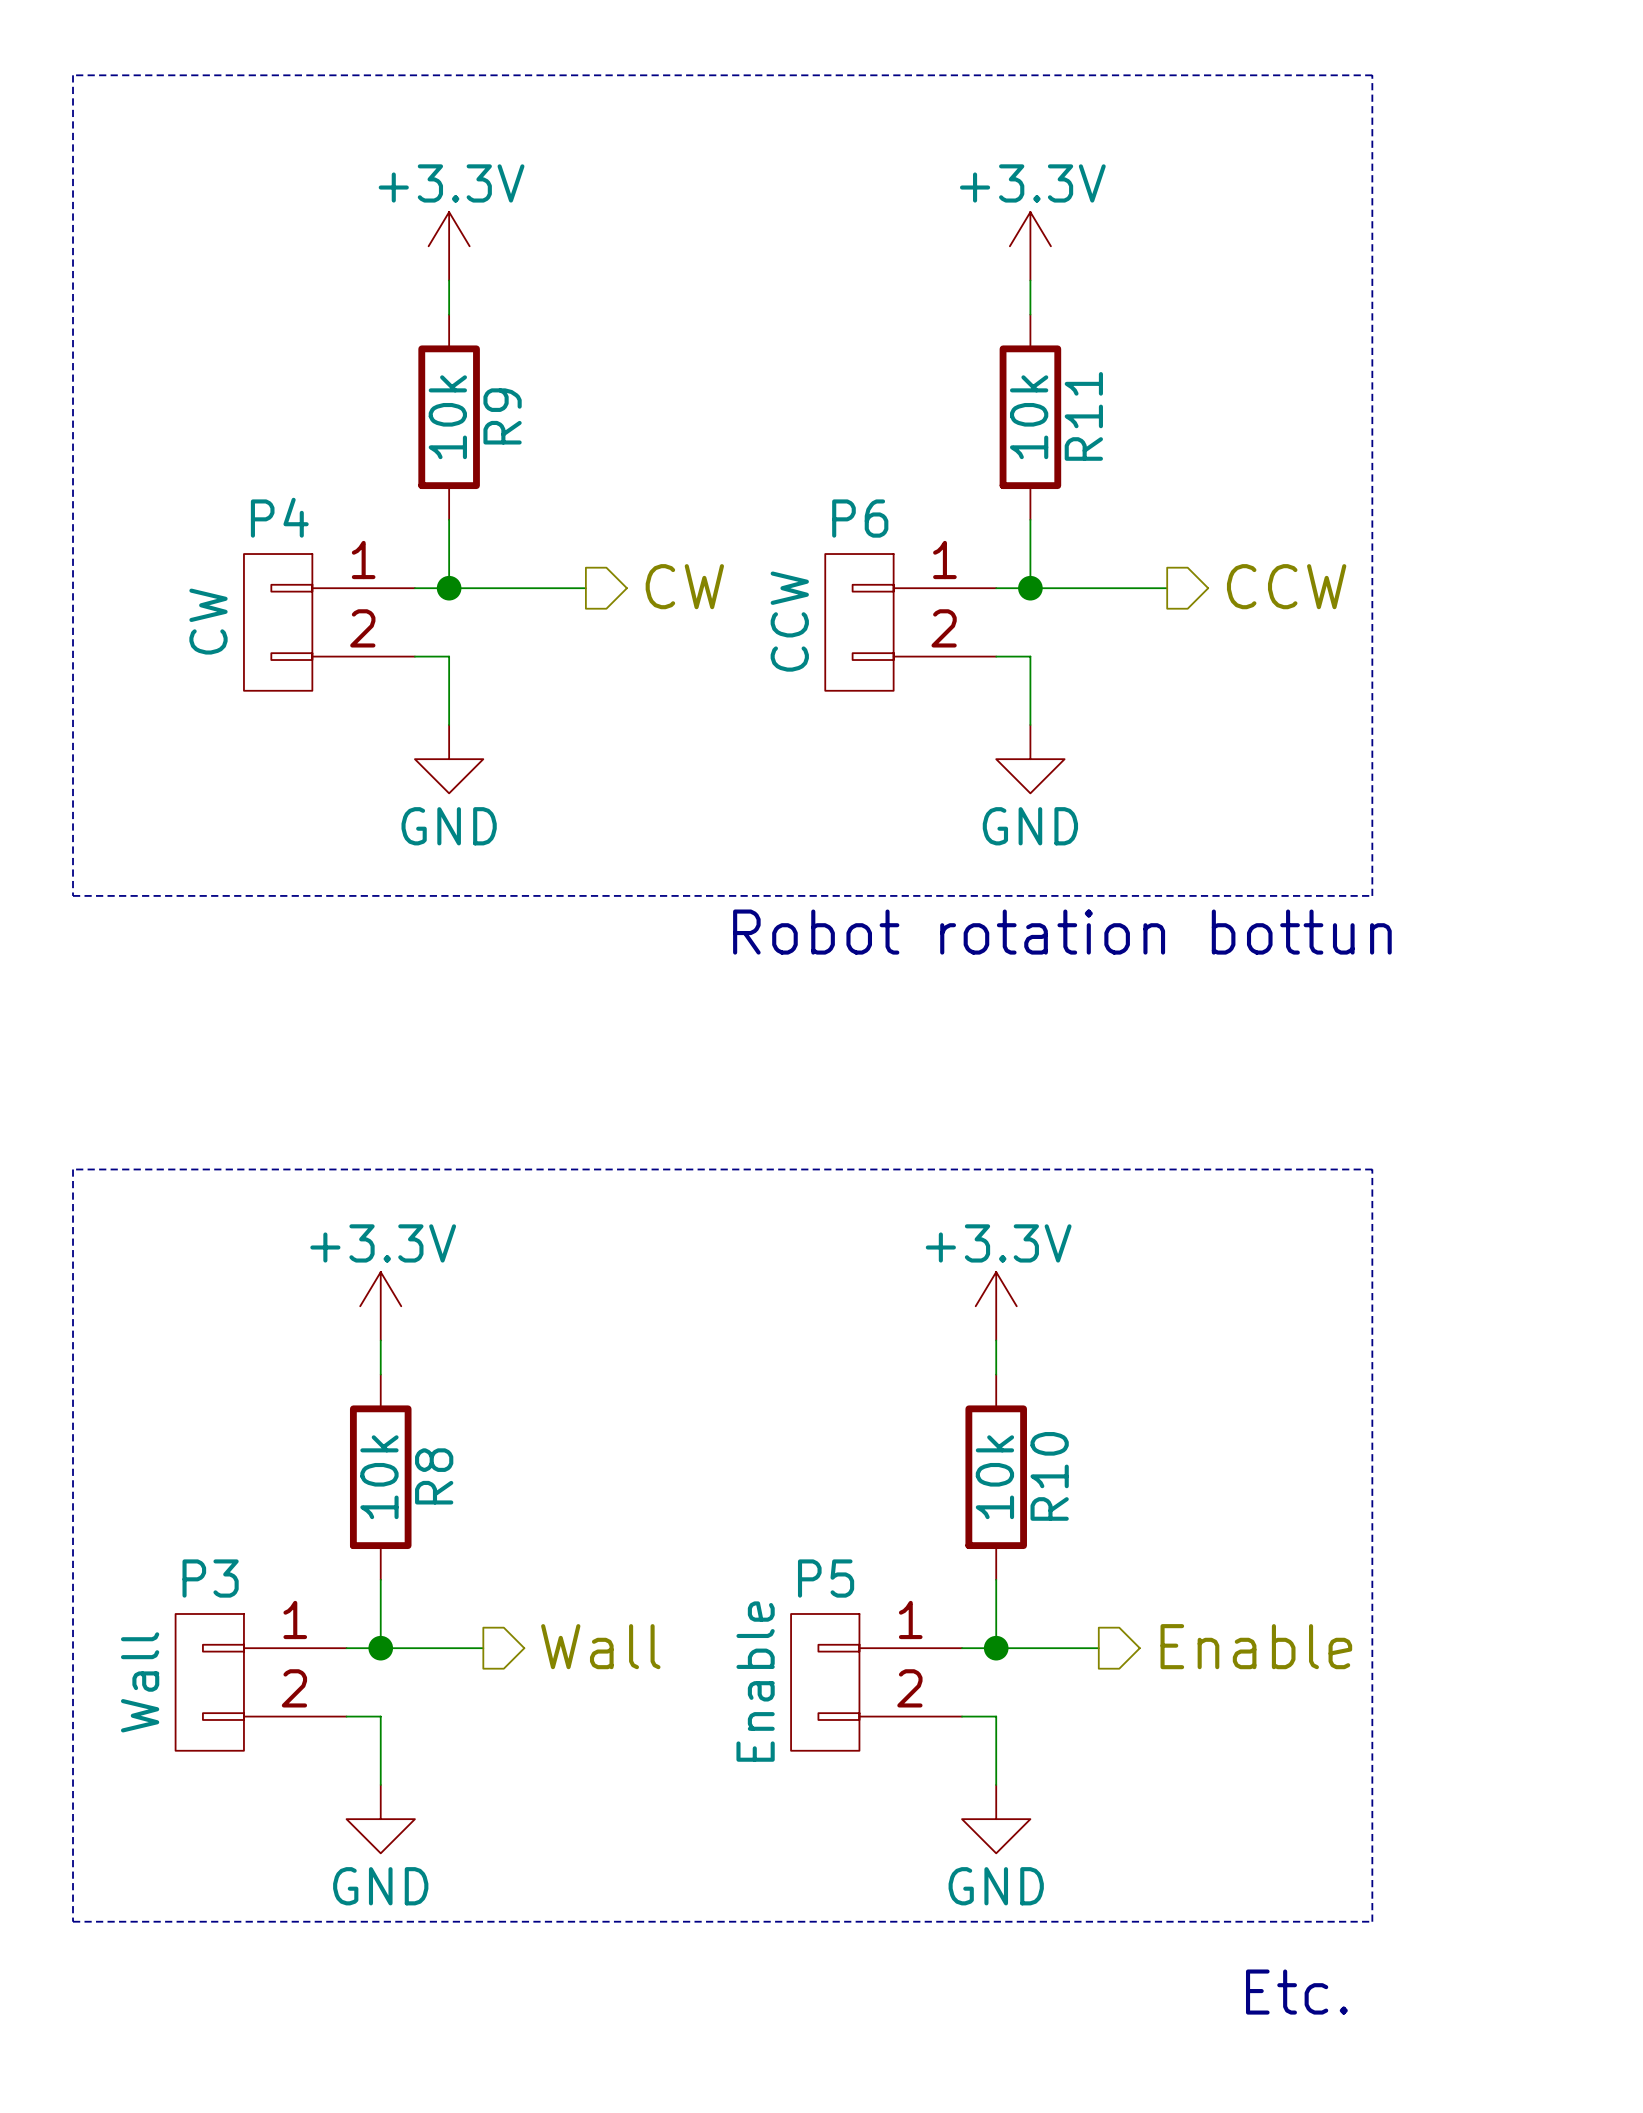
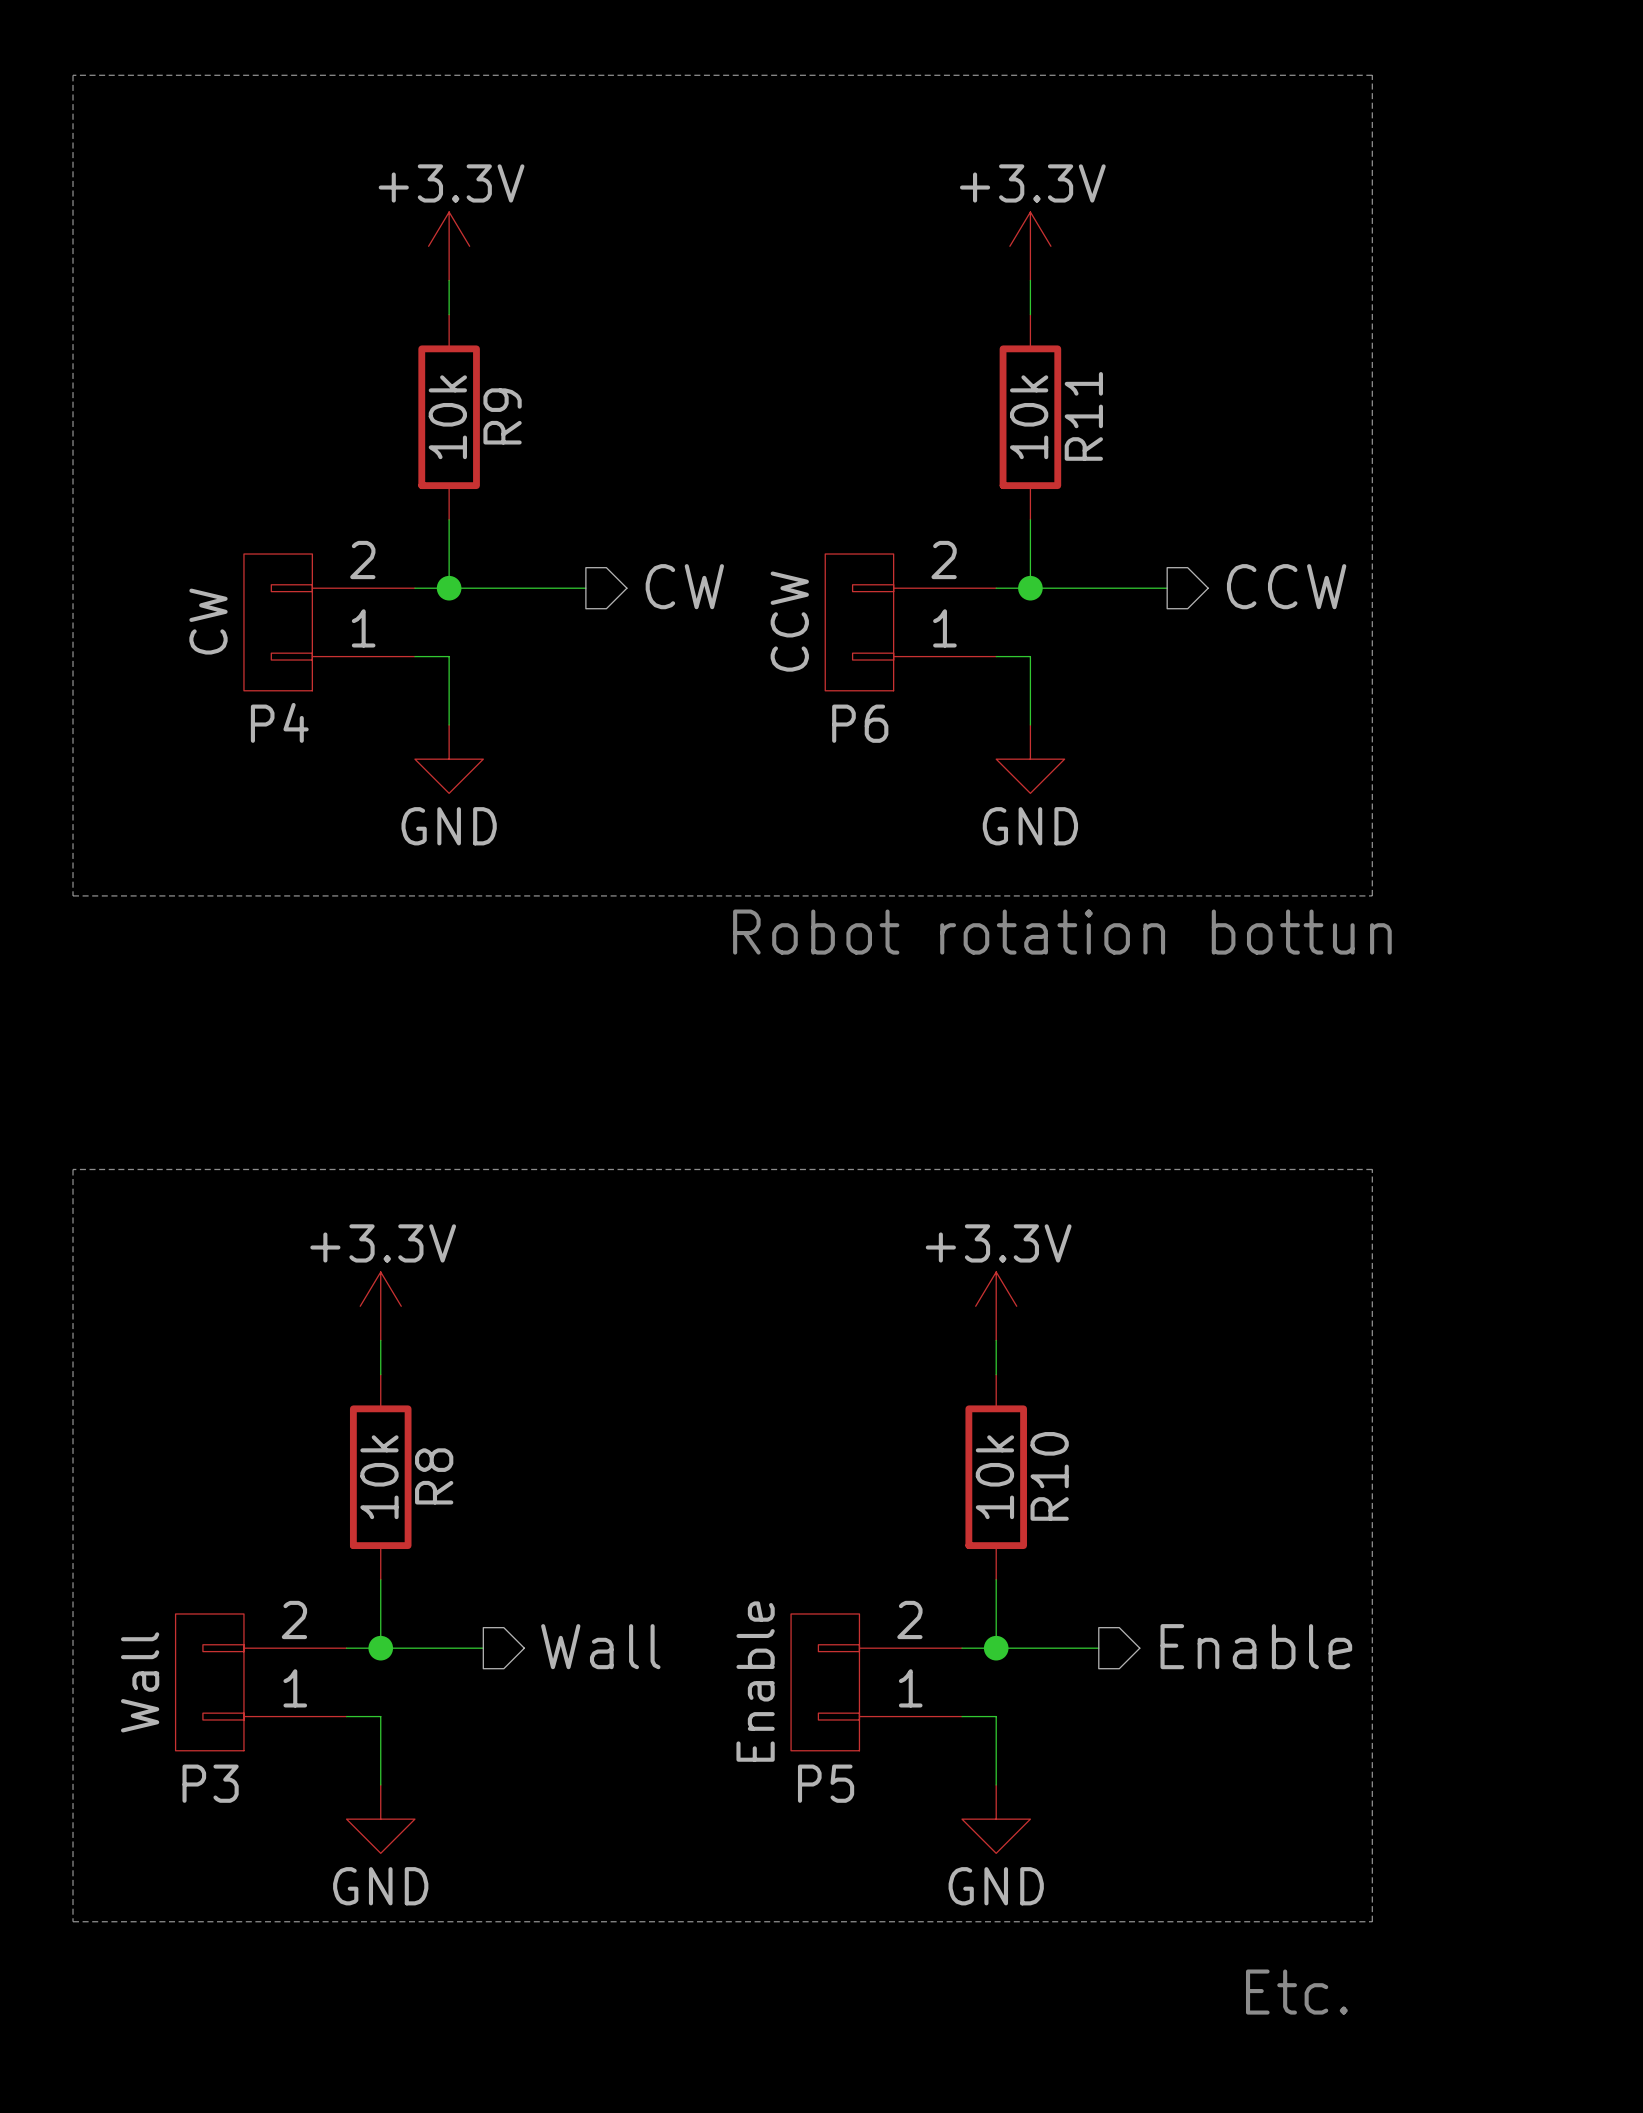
P4 flip: as is (278, 622) -> up-down (278, 622)
P6 flip: as is (859, 622) -> up-down (859, 622)
P3 flip: as is (209, 1682) -> up-down (209, 1682)
P5 flip: as is (825, 1682) -> up-down (825, 1682)

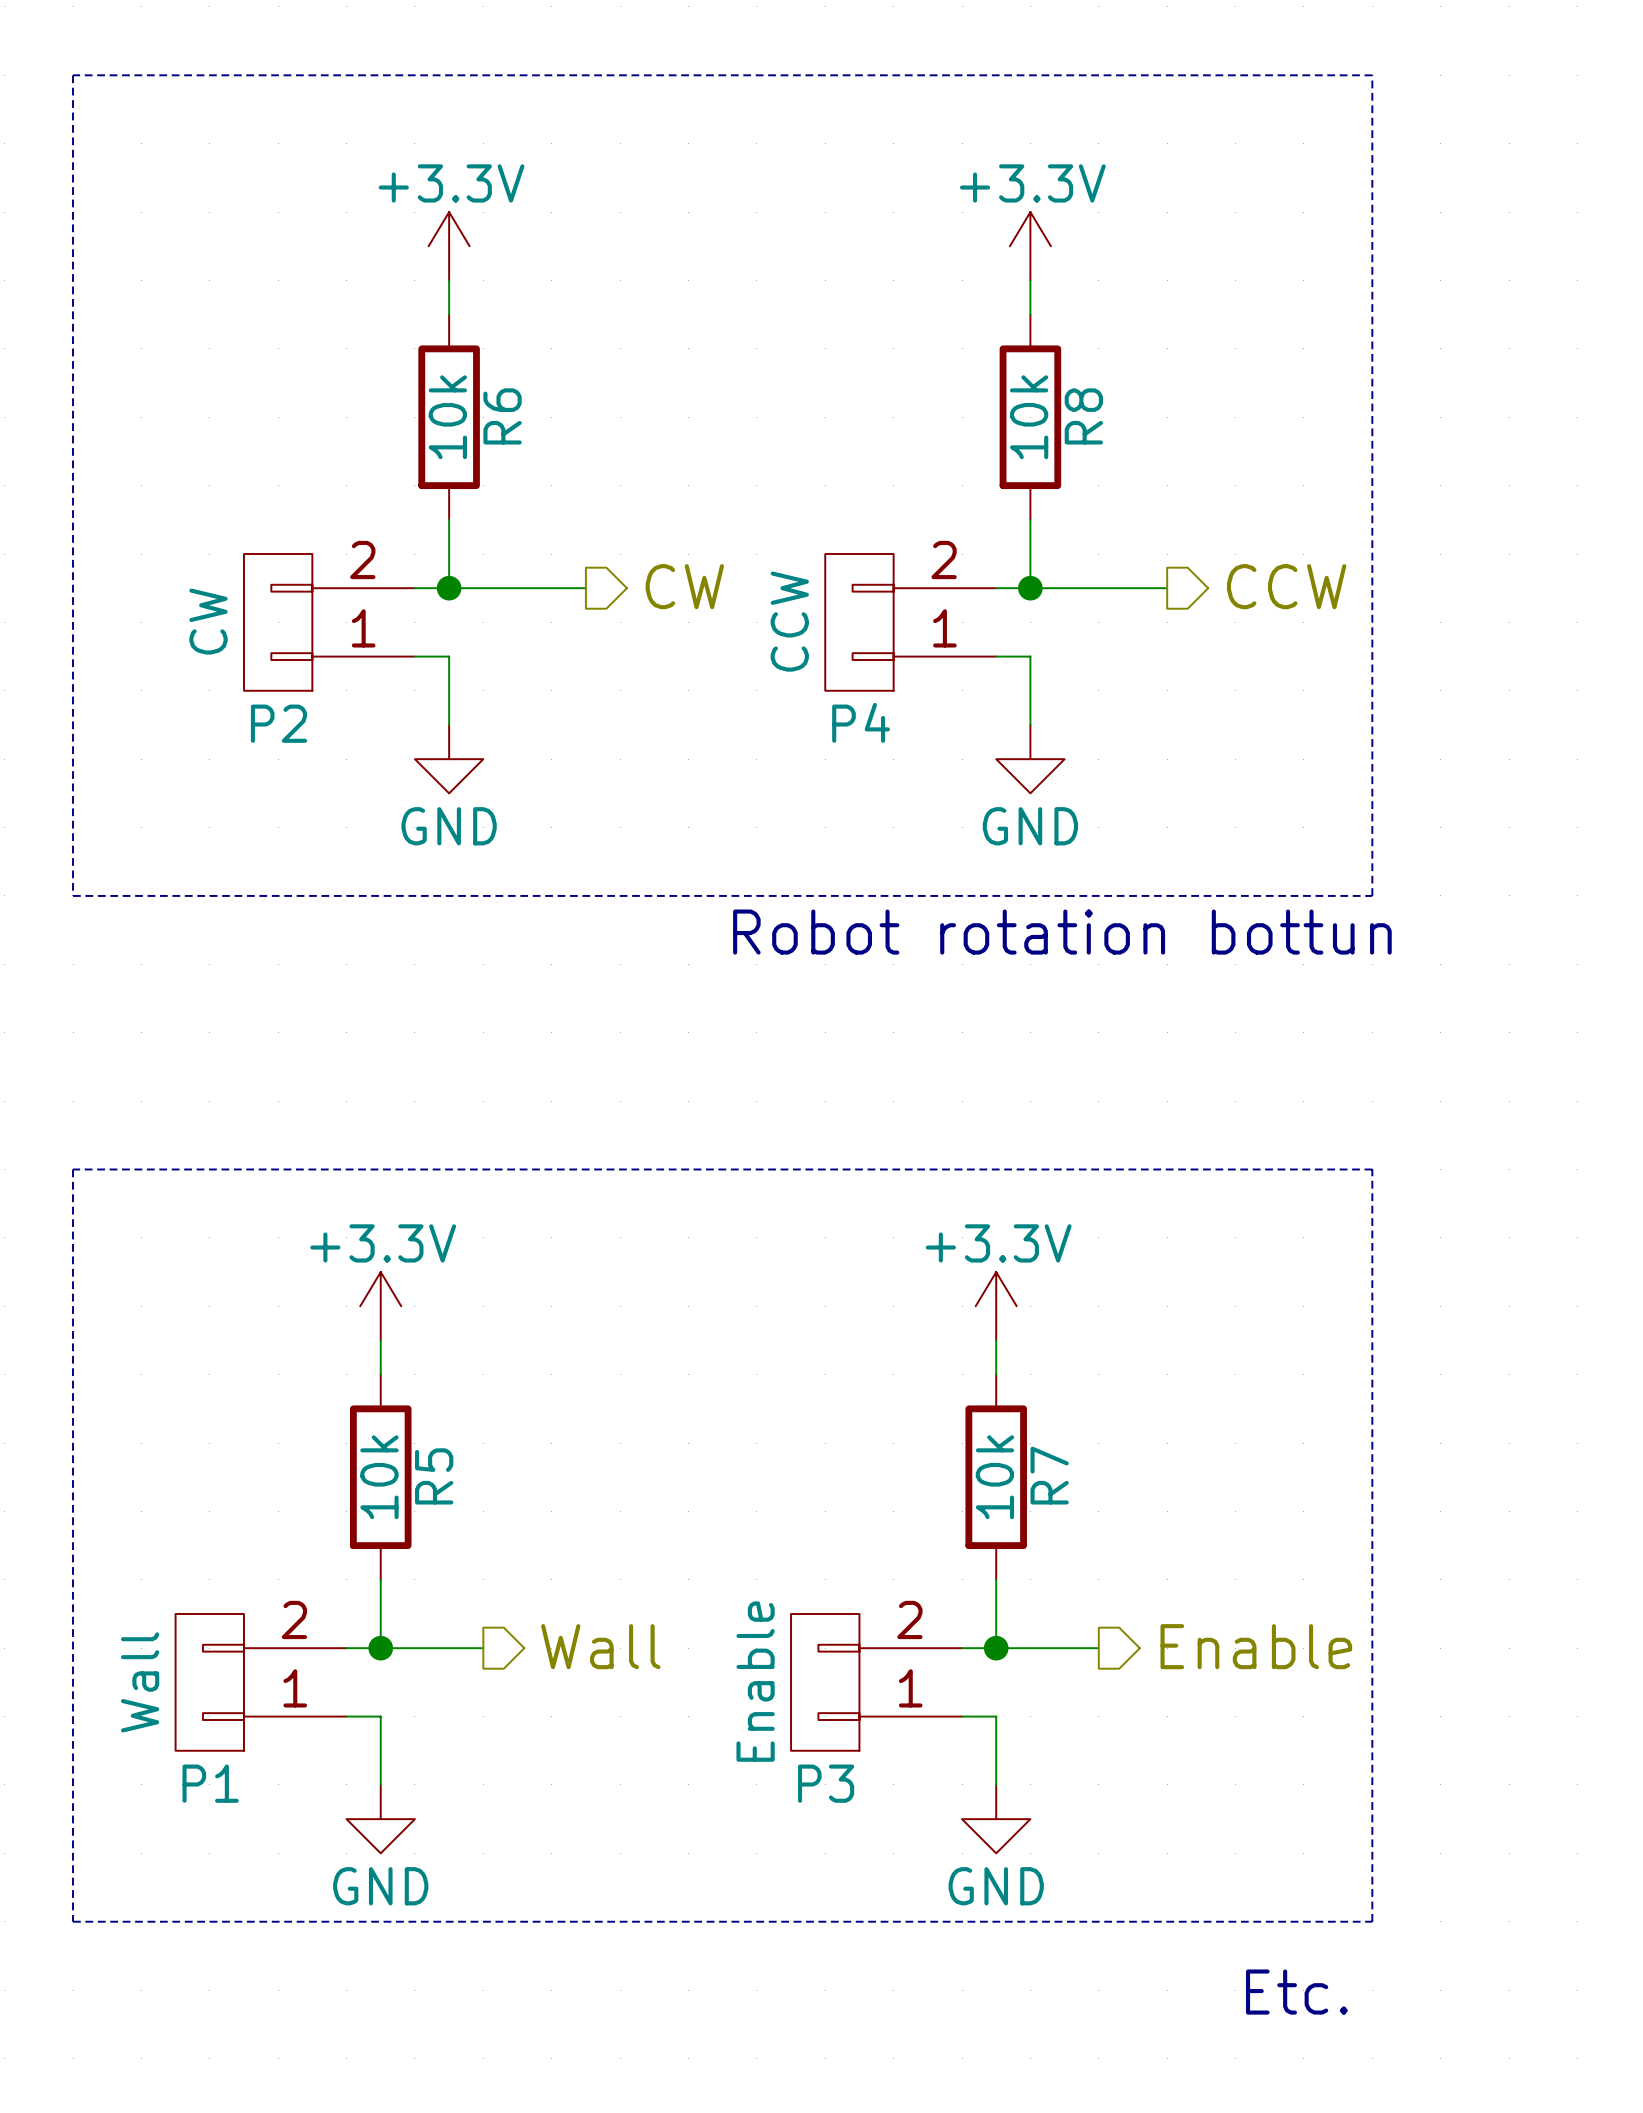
R9 name: R9 (502, 416) -> R6 (502, 416)
R11 name: R11 (1083, 416) -> R8 (1083, 416)
P4 name: P4 (279, 722) -> P2 (278, 723)
P6 name: P6 (860, 723) -> P4 (861, 722)
R8 name: R8 (434, 1476) -> R5 (434, 1476)
R10 name: R10 (1049, 1476) -> R7 (1049, 1475)
P3 name: P3 (210, 1783) -> P1 (210, 1783)
P5 name: P5 (826, 1783) -> P3 (826, 1783)

